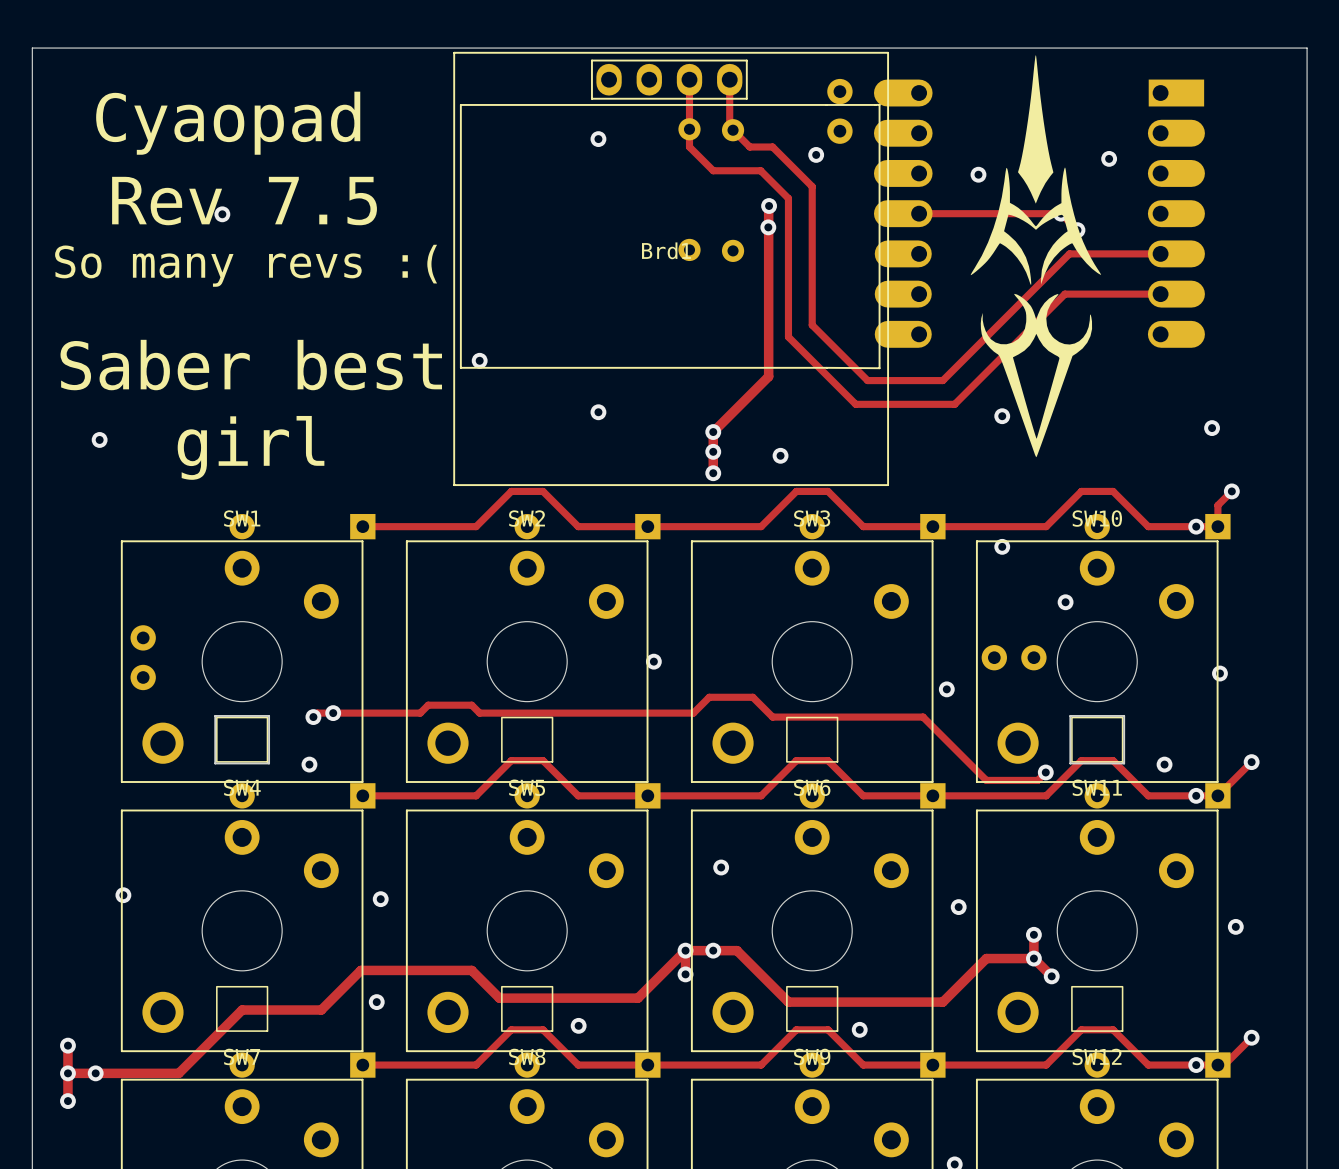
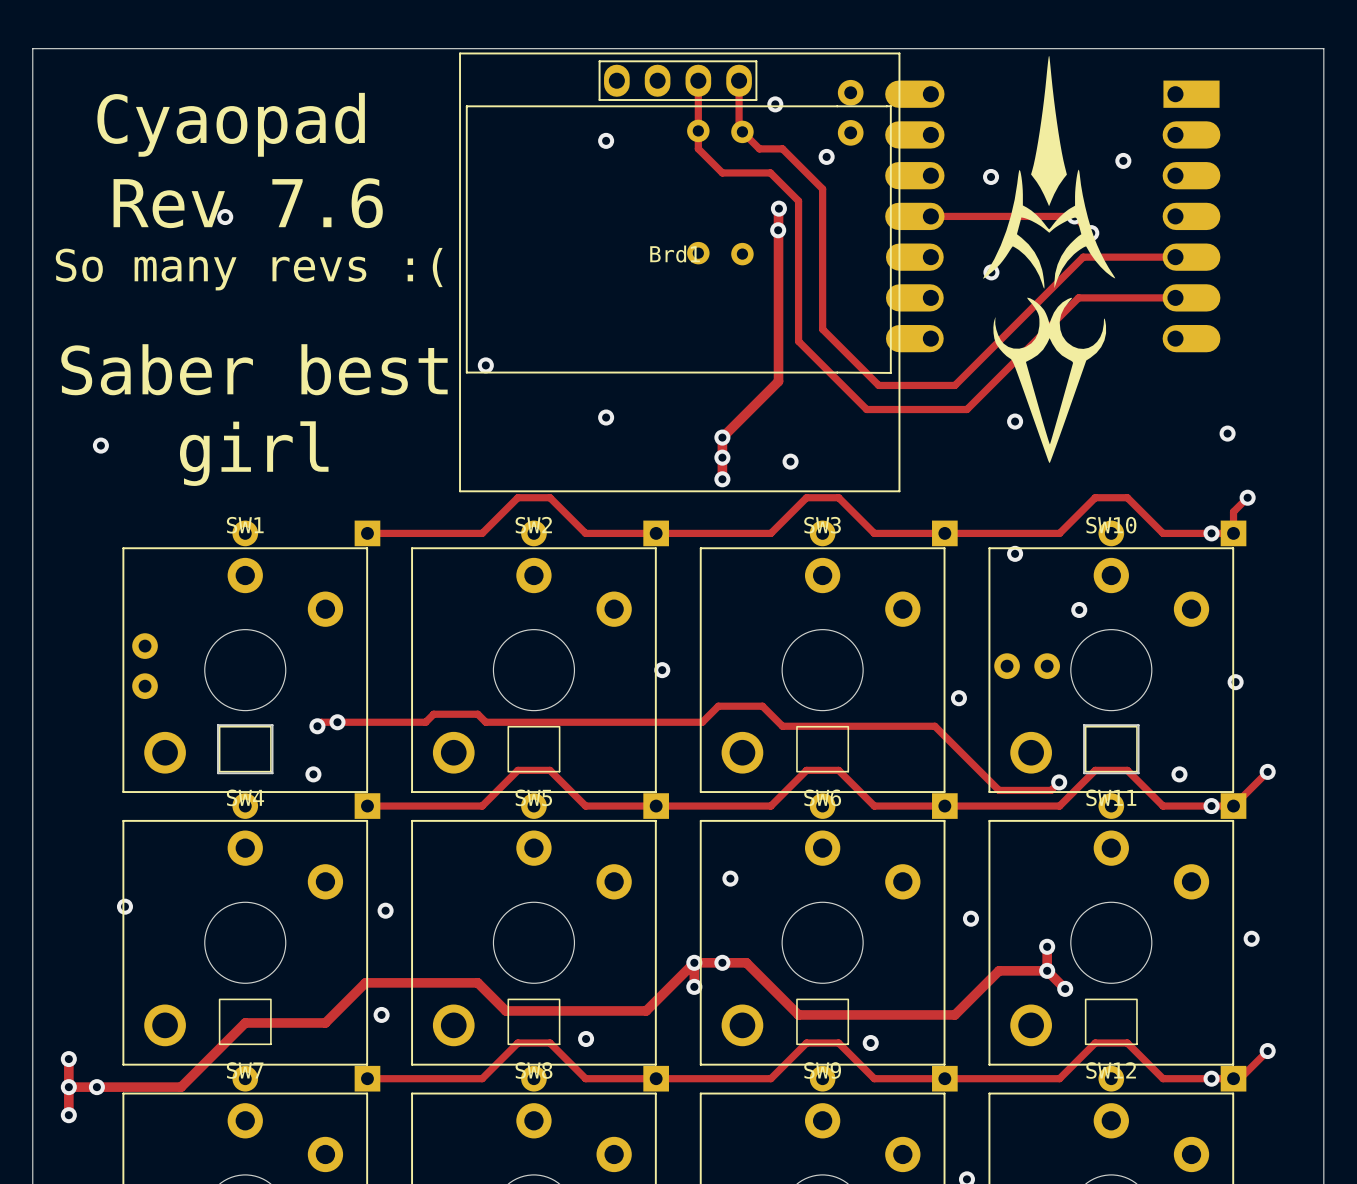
via: none -> (775, 104)
text: Rev 7.5 (244, 201) -> Rev 7.6 (248, 203)
via: none -> (991, 272)

